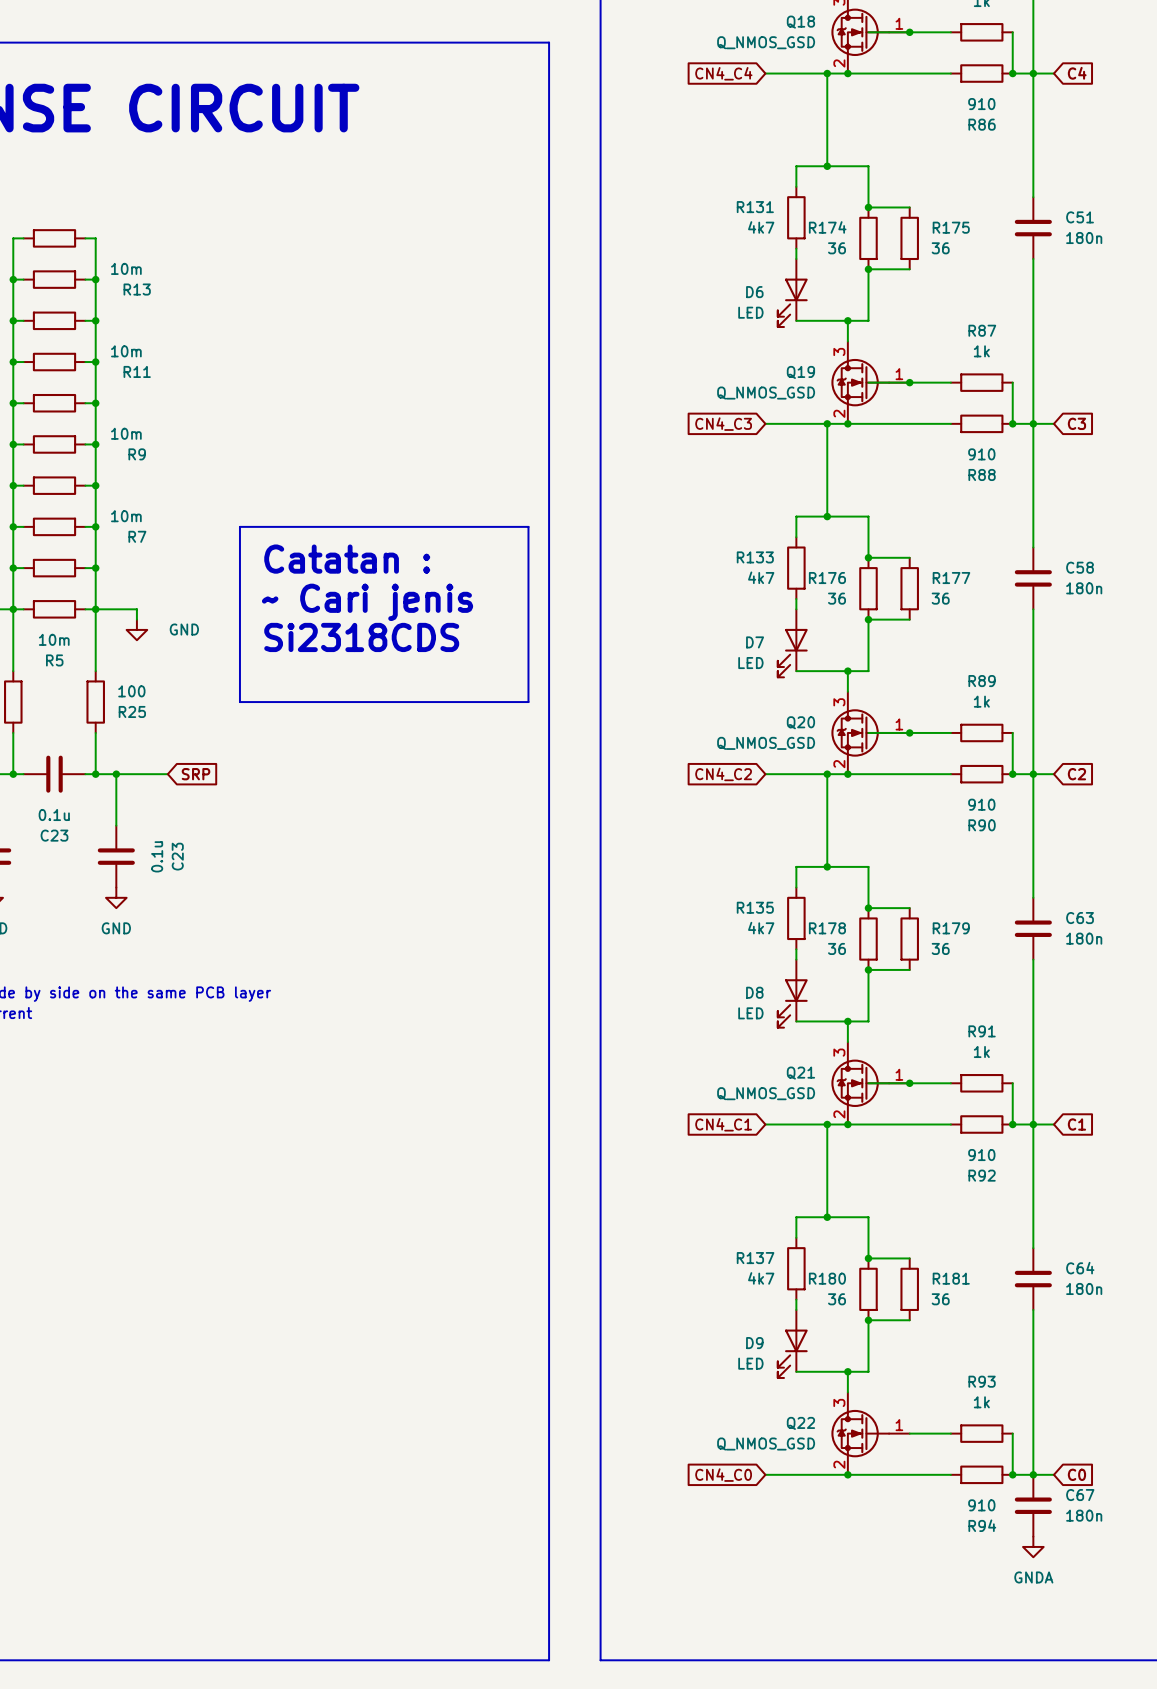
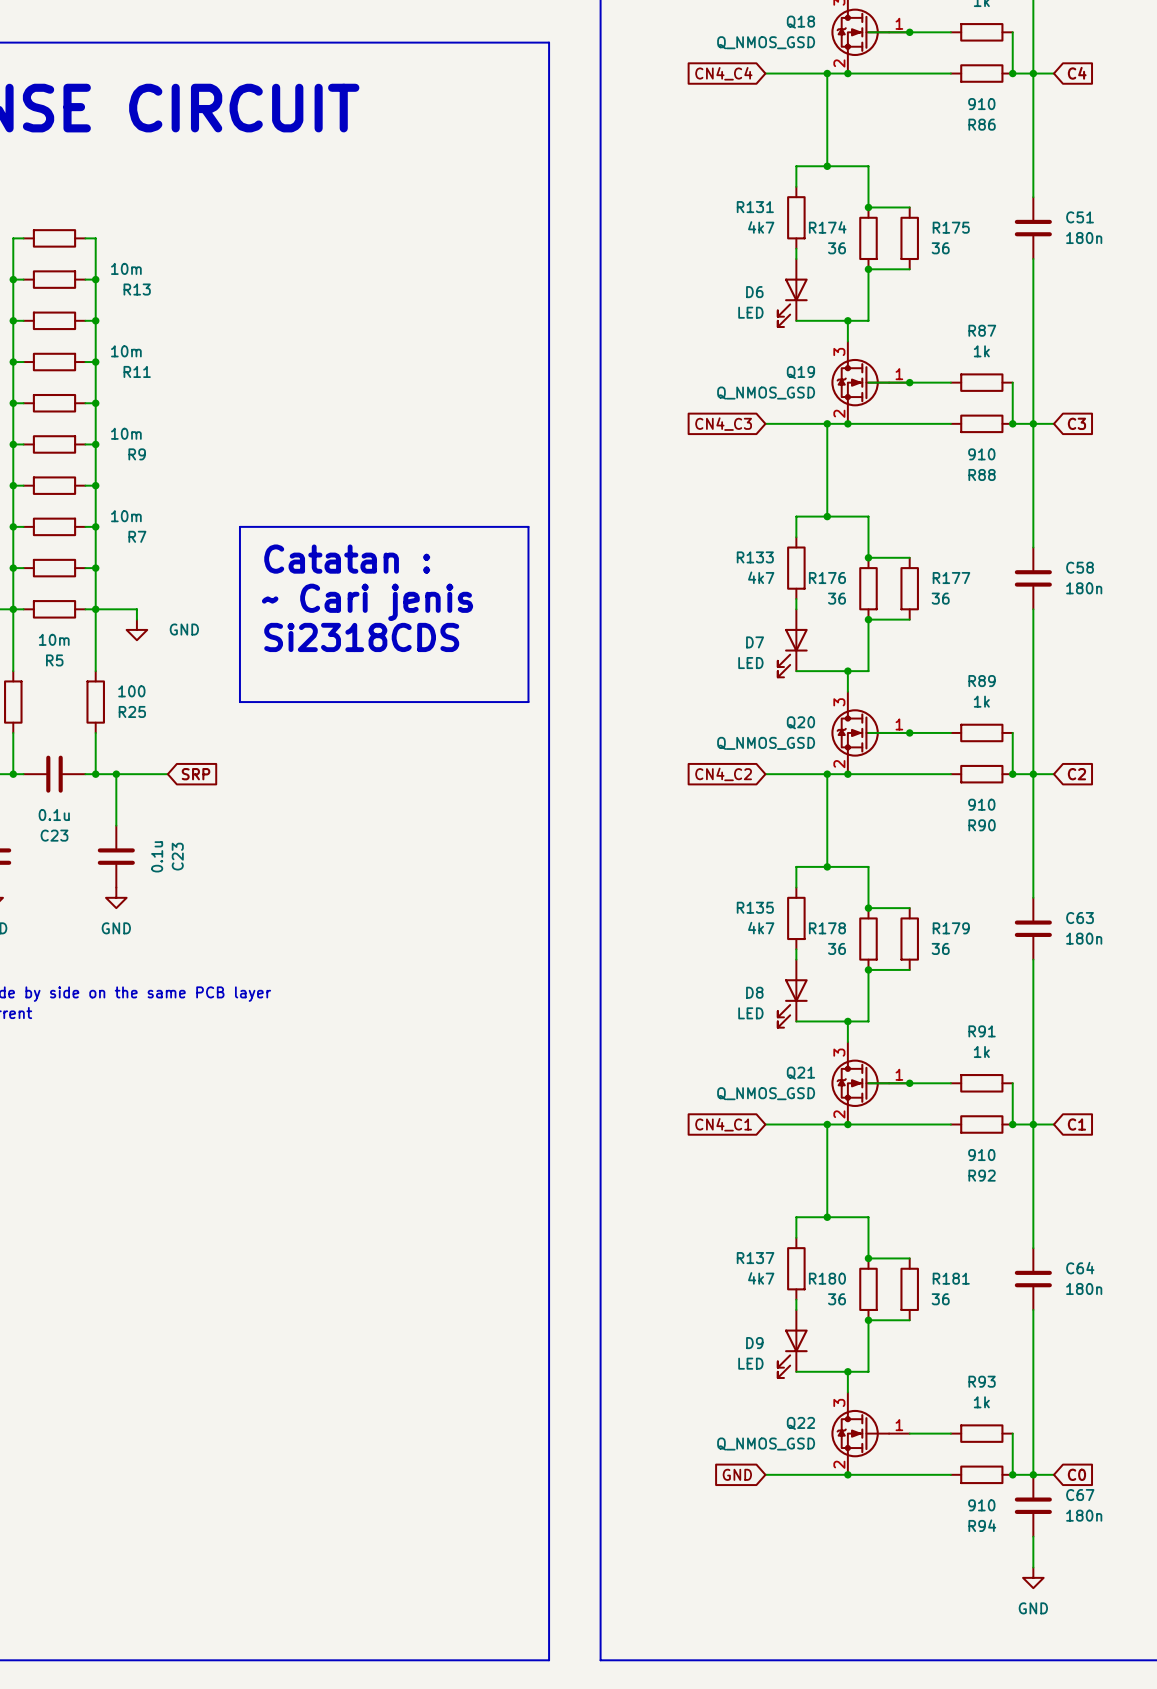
global label: CN4_C0 (723, 1475) -> GND (737, 1474)
wire: none -> (1033, 1536) (1033, 1567)
power symbol: GNDA (1033, 1546) -> none
power symbol: none -> GND (1033, 1577)

